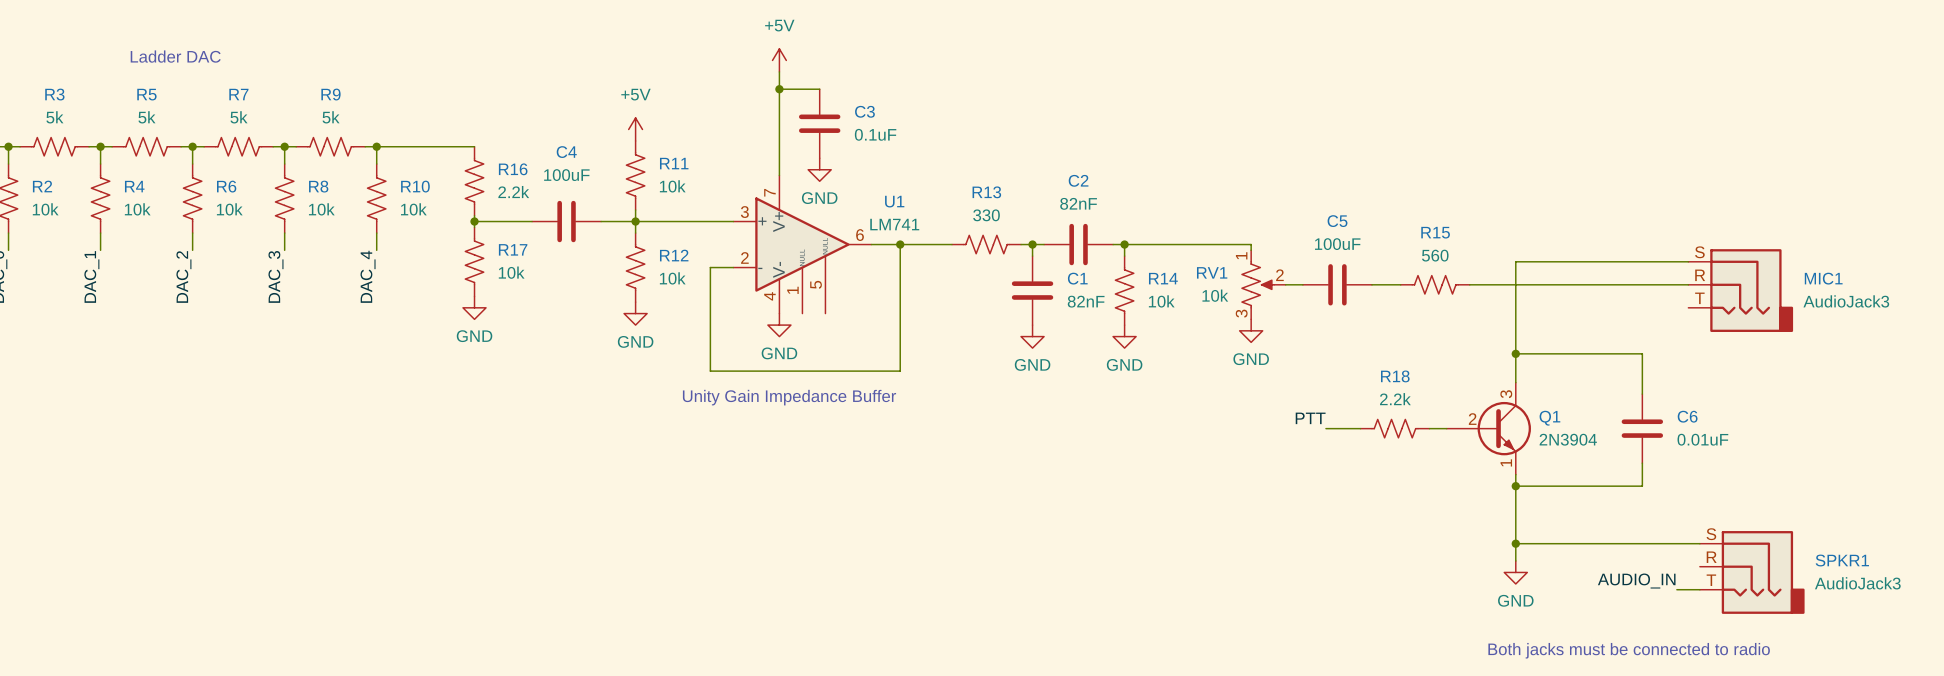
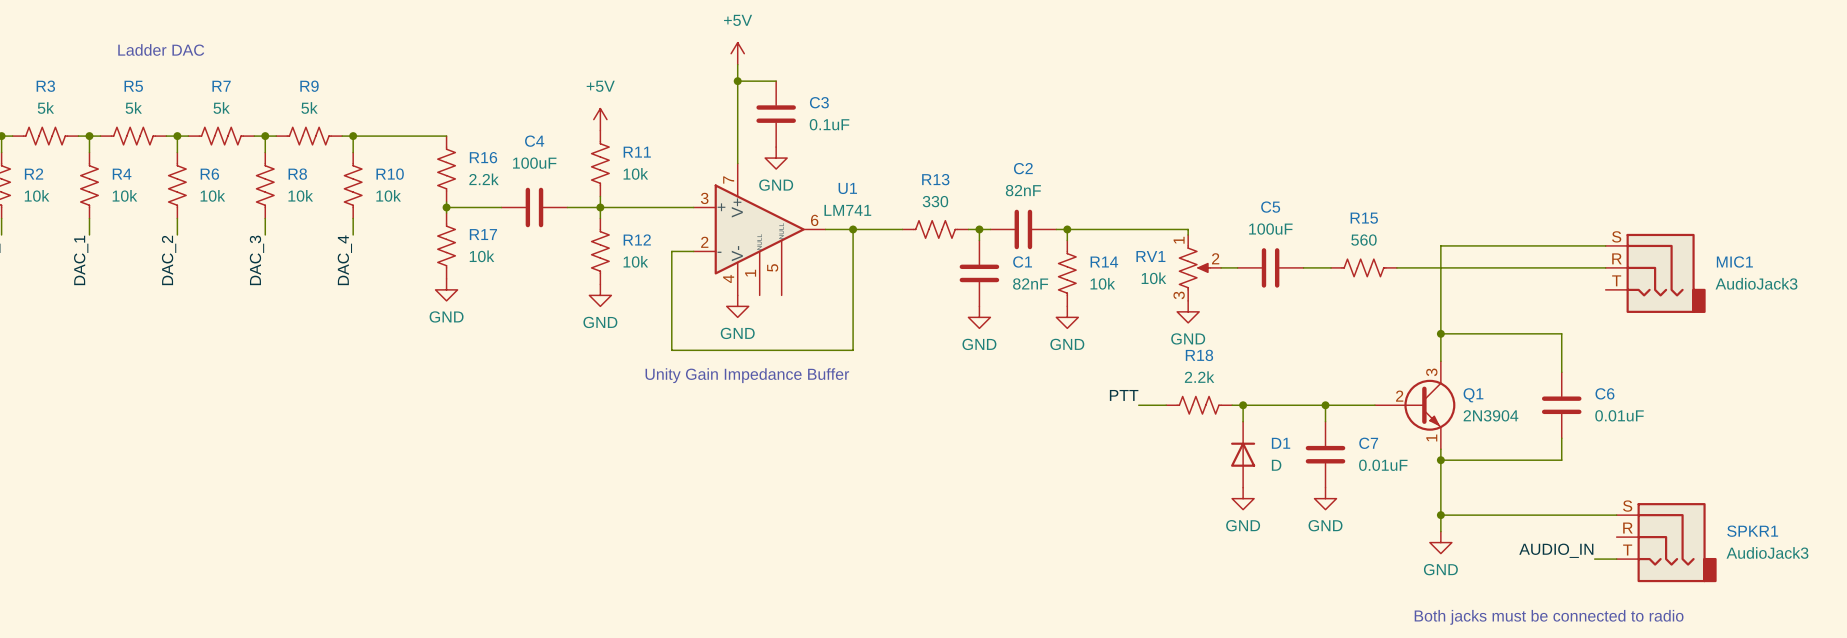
label position: PTT (1310, 418) -> PTT (1124, 395)
wire: none -> (1138, 405) (1166, 405)
wire: none -> (1232, 405) (1259, 405)
wire: none -> (1243, 405) (1243, 421)
junction: none -> (1243, 405)
wire: none -> (1325, 405) (1325, 421)
R18 position: (1394, 428) -> (1199, 405)
junction: none -> (1325, 405)
D1: none -> D (1243, 454)
C7: none -> 0.01uF (1325, 454)
power symbol: none -> GND (1243, 498)
power symbol: none -> GND (1325, 498)

